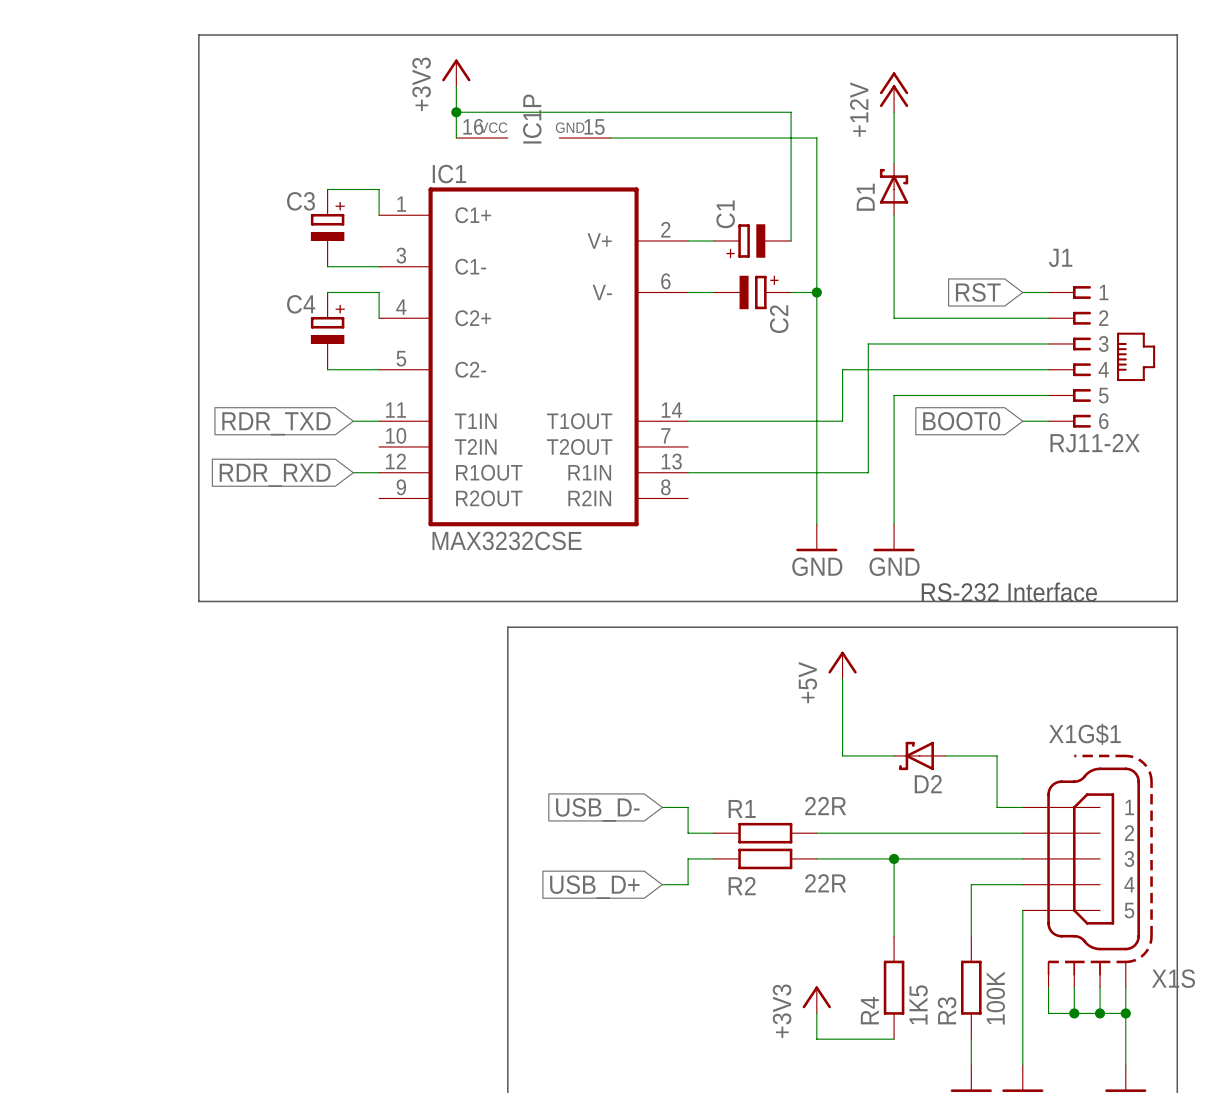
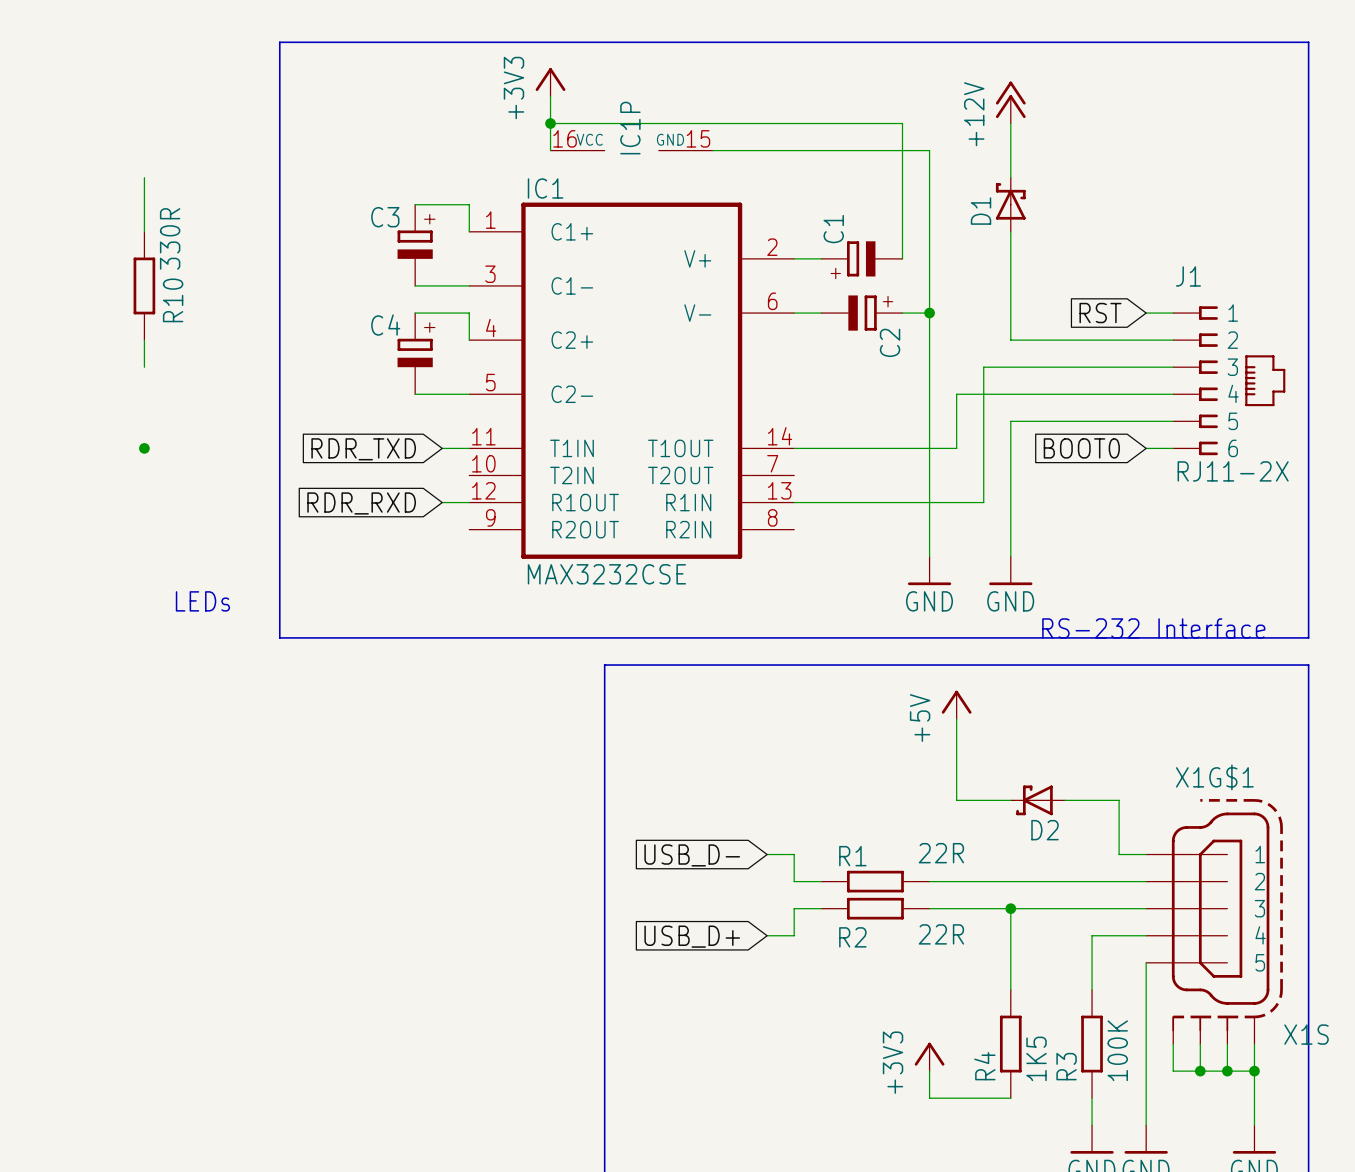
wire: none -> (144, 177) (144, 231)
R10: none -> 330R (144, 285)
wire: none -> (144, 340) (144, 367)
junction: none -> (144, 448)
text: none -> LEDs (202, 601)

